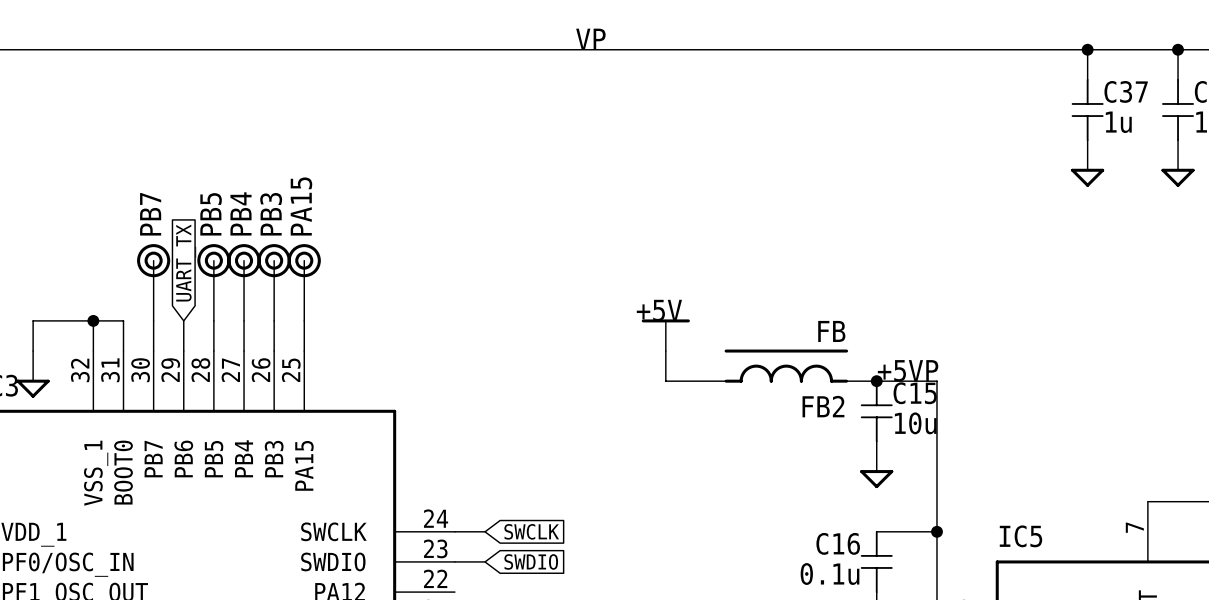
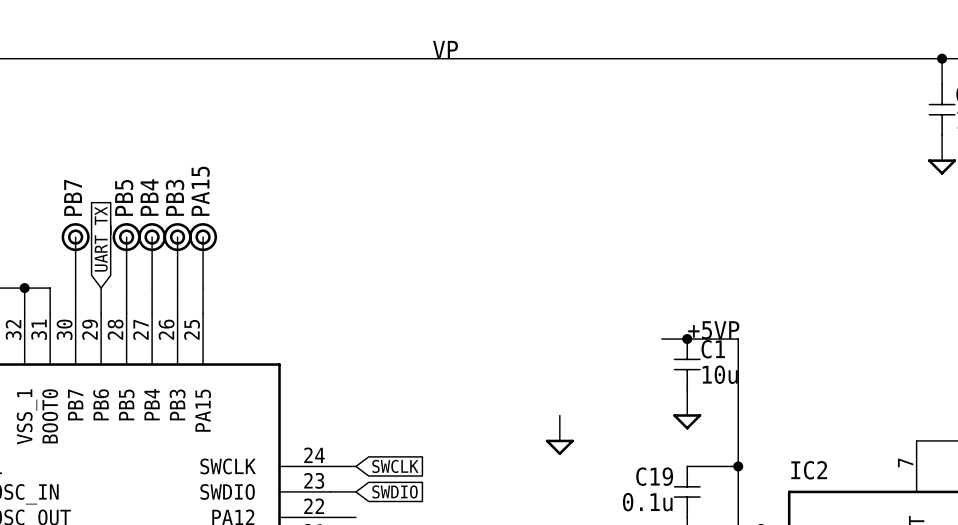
wire: (1087, 49) (1087, 79) -> none
junction: (1087, 49) -> none
C37: 1u (1087, 110) -> none
power symbol: (1087, 163) -> none
power symbol: +5V (665, 335) -> none
wire: (665, 351) (665, 381) (726, 381) -> none
FB2: FB (786, 366) -> none
C15 name: C15 (915, 393) -> C1 (713, 349)
power symbol: none -> (559, 435)
IC5 name: IC5 (1020, 536) -> IC2 (809, 470)
C16 name: C16 (838, 543) -> C19 (654, 476)
wire: none -> (330, 517) (355, 517)

